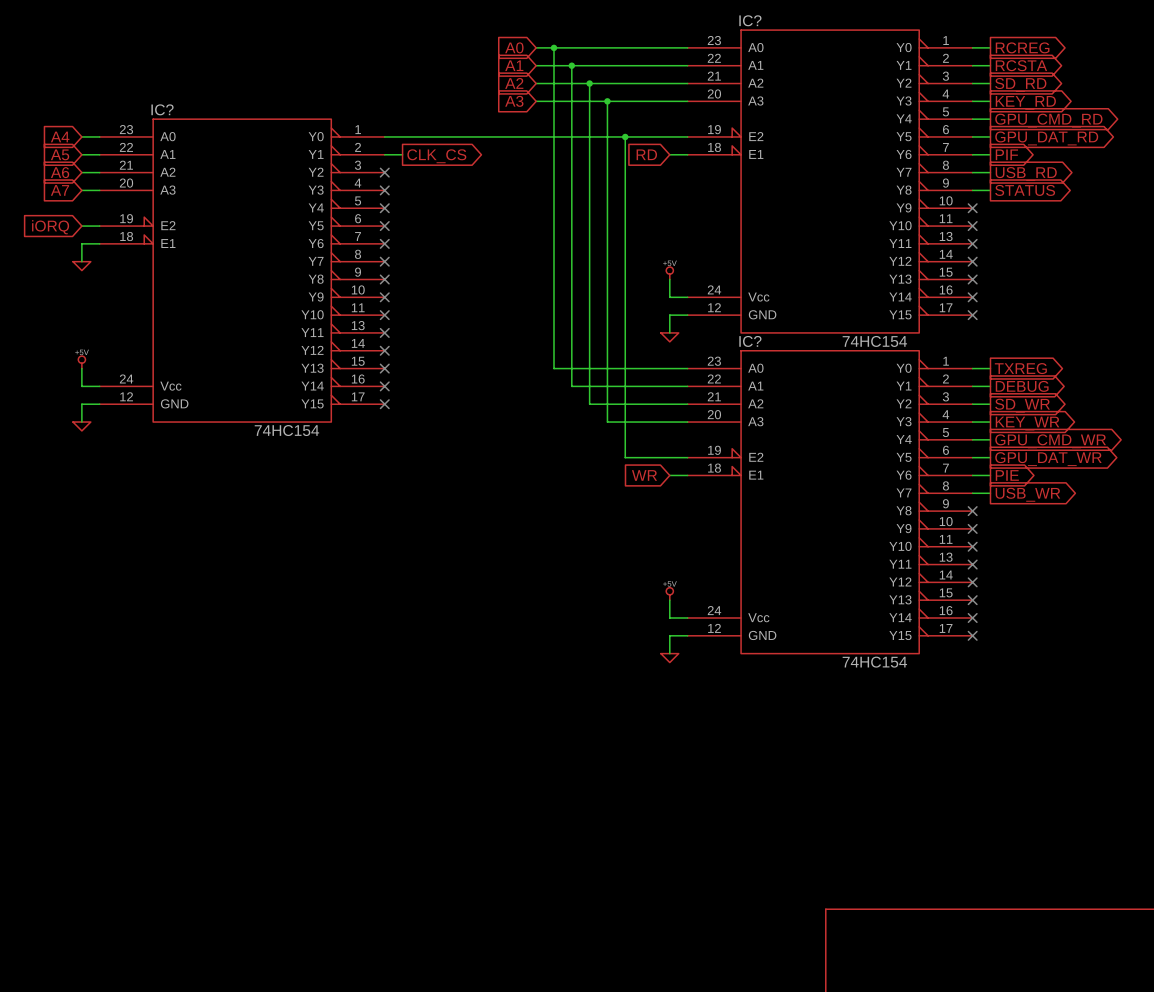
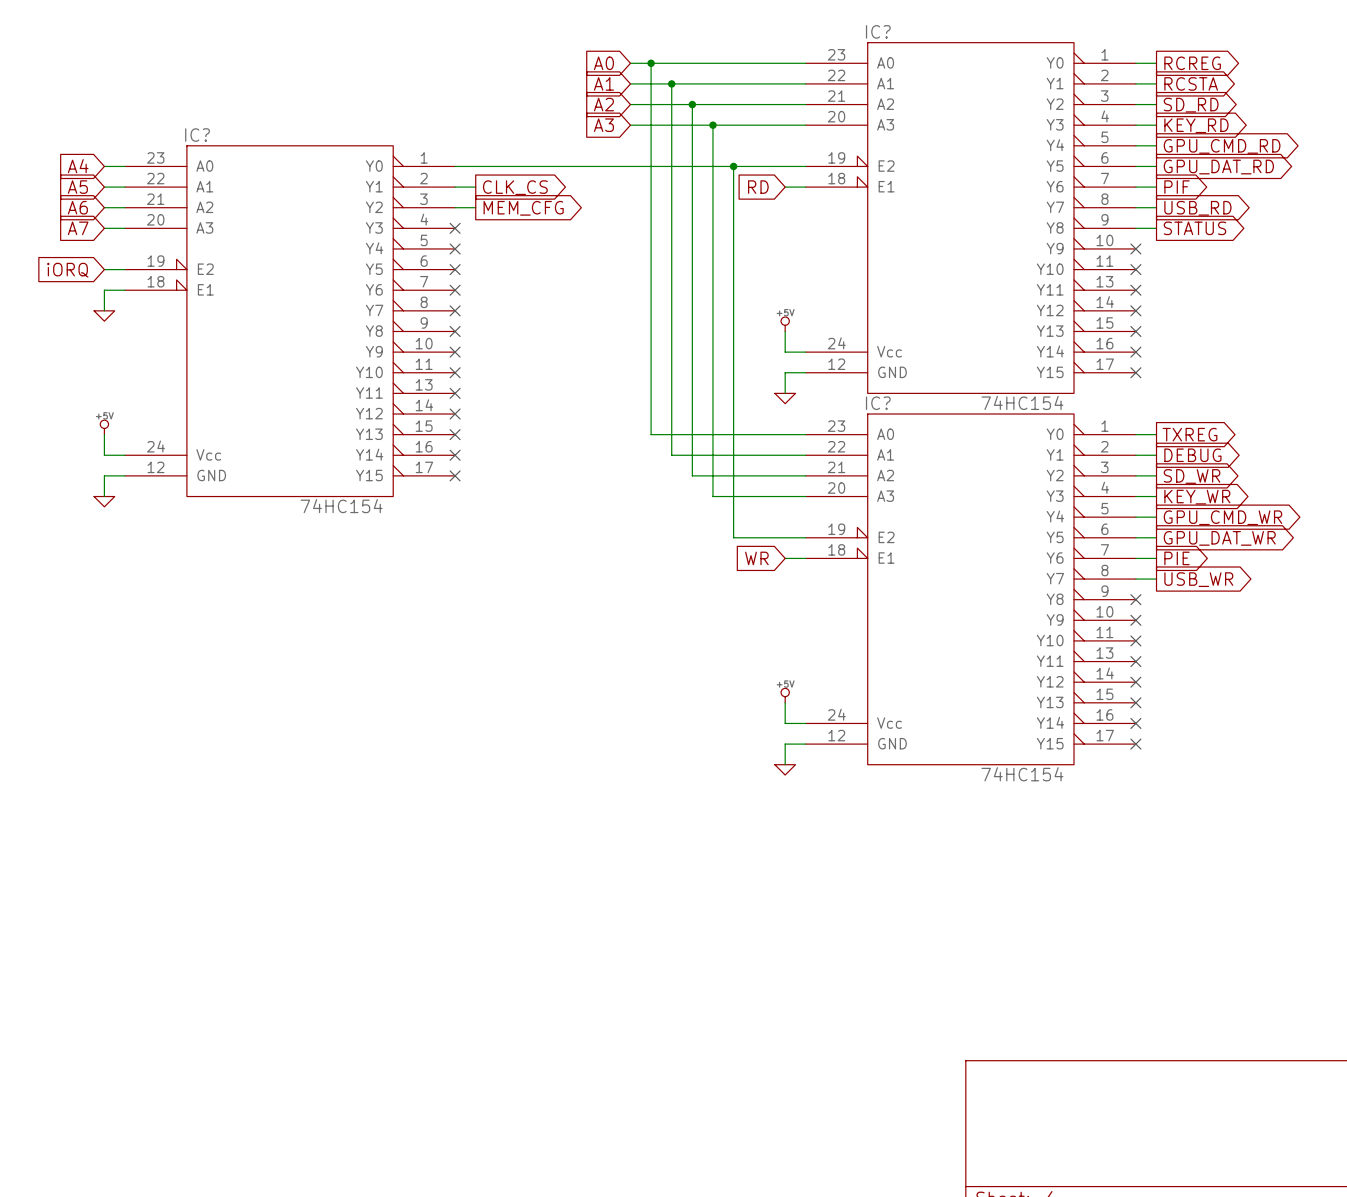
wire: none -> (455, 207) (475, 207)
no-connect mark: (384, 172) -> none
global label: none -> MEM_CFG (523, 208)

